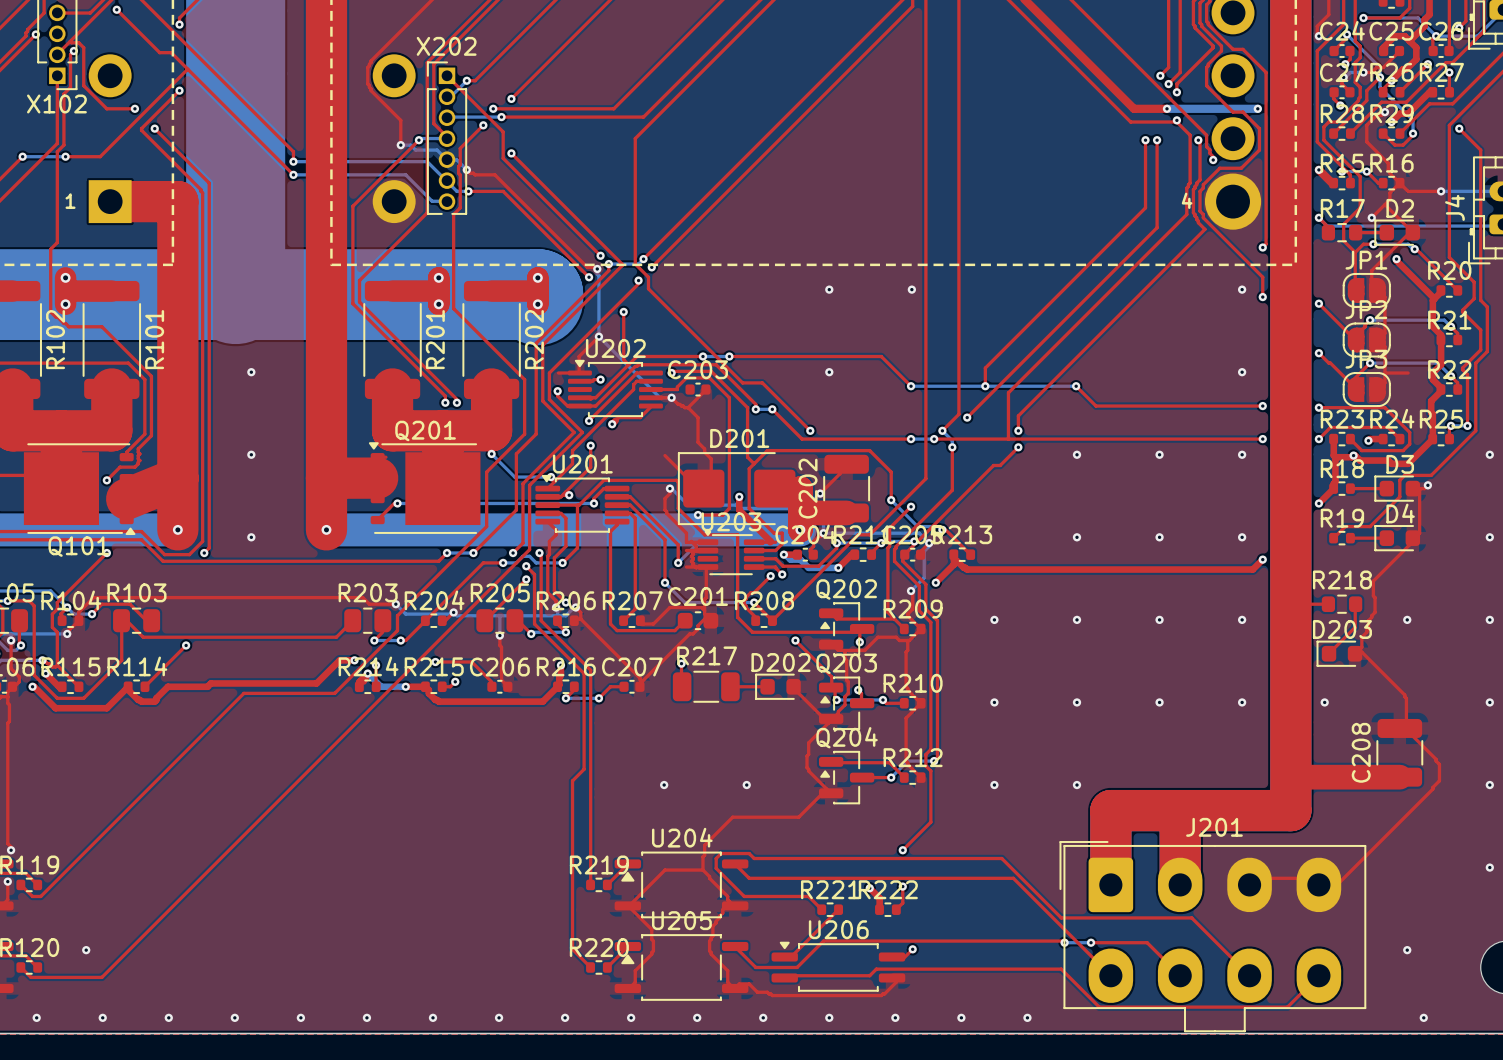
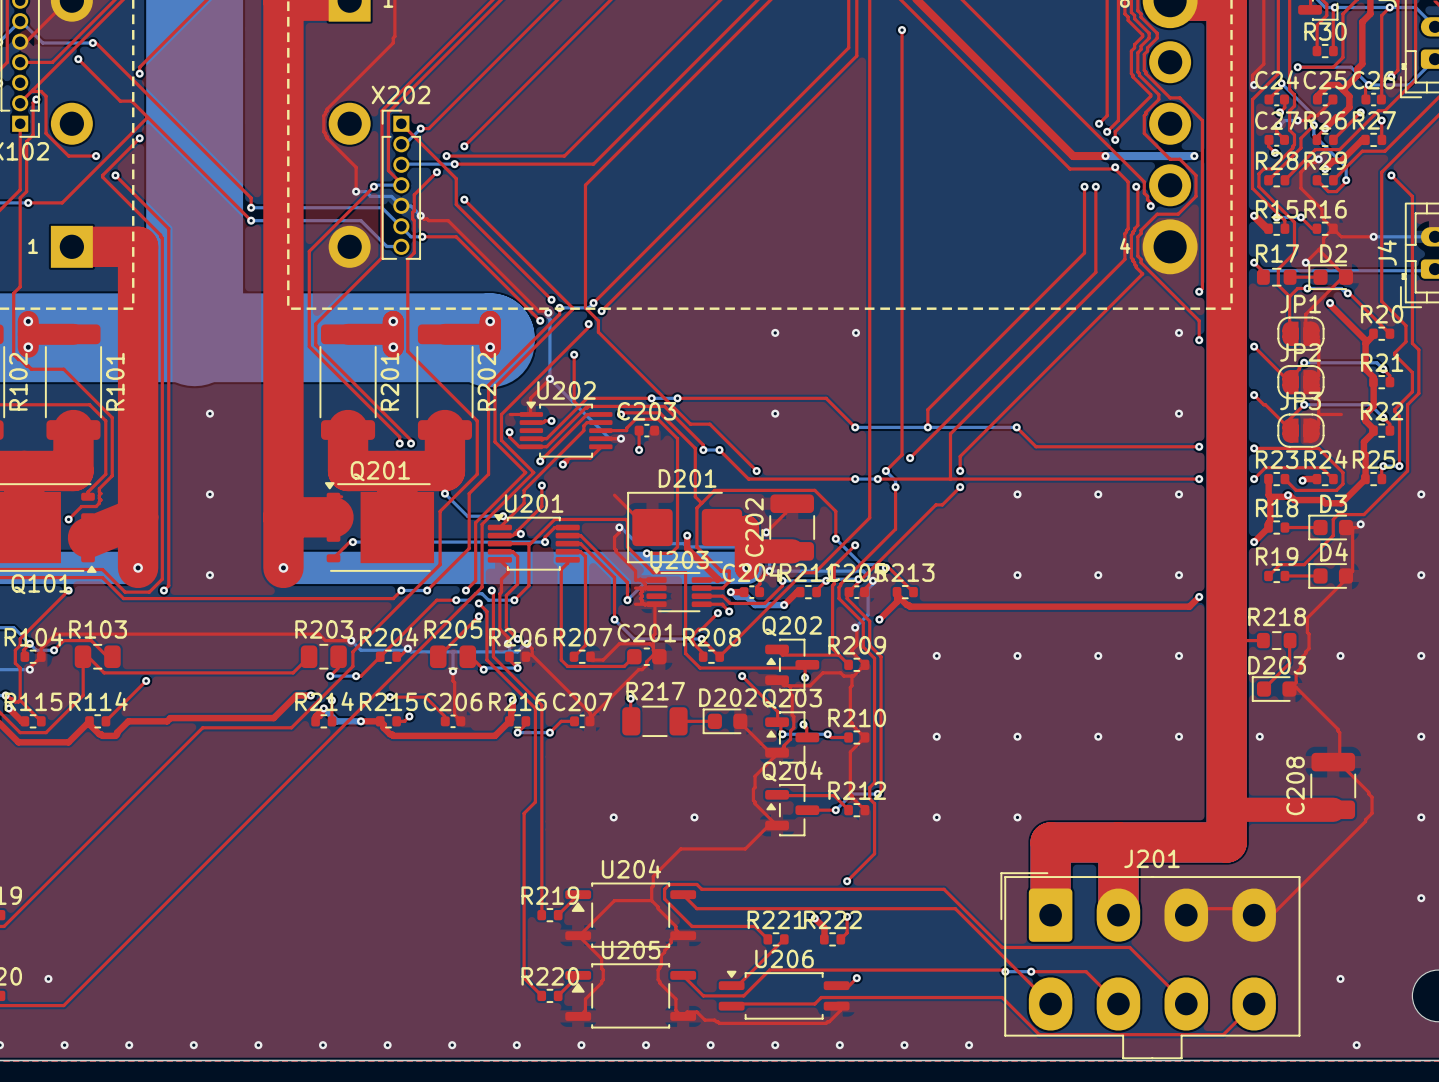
top track: none -> (639, 430) (639, 450)
top track: (706, 389) (688, 407) -> none
top track: (671, 397) (678, 404) (688, 407) -> none
top track: (688, 407) (698, 417) (698, 442) (711, 458) (711, 482) (704, 488) -> none
via: none -> (639, 450)

